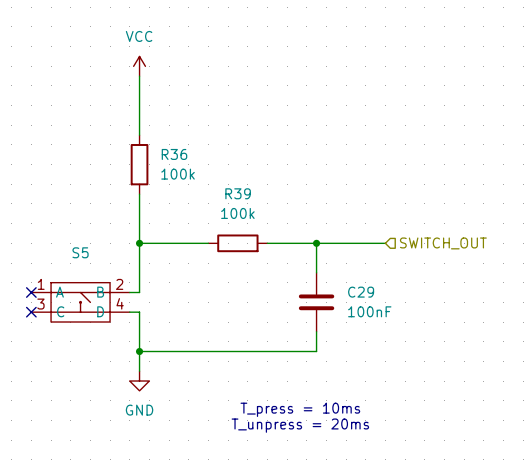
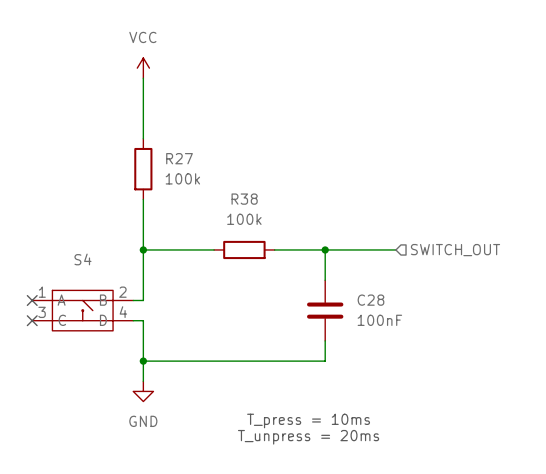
R36 name: R36 (174, 154) -> R27 (179, 158)
R39 name: R39 (238, 193) -> R38 (244, 199)
S5 name: S5 (80, 252) -> S4 (82, 259)
C29 name: C29 (361, 292) -> C28 (370, 300)

